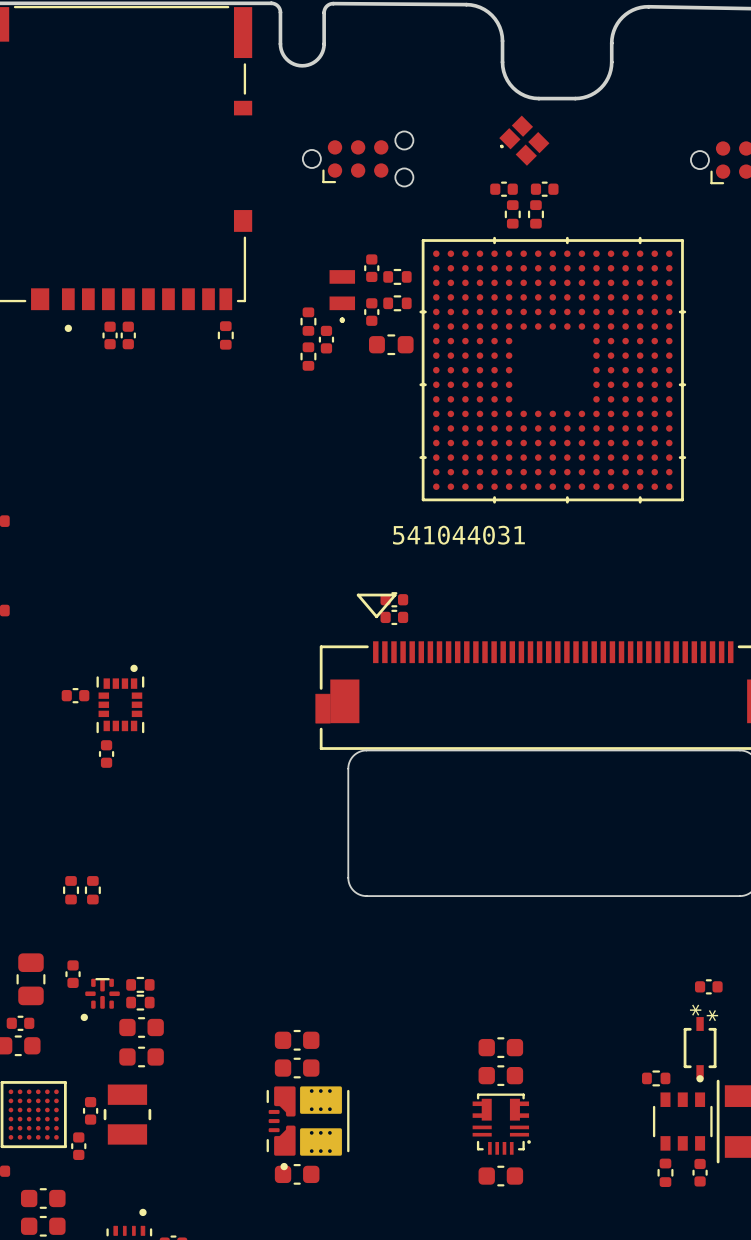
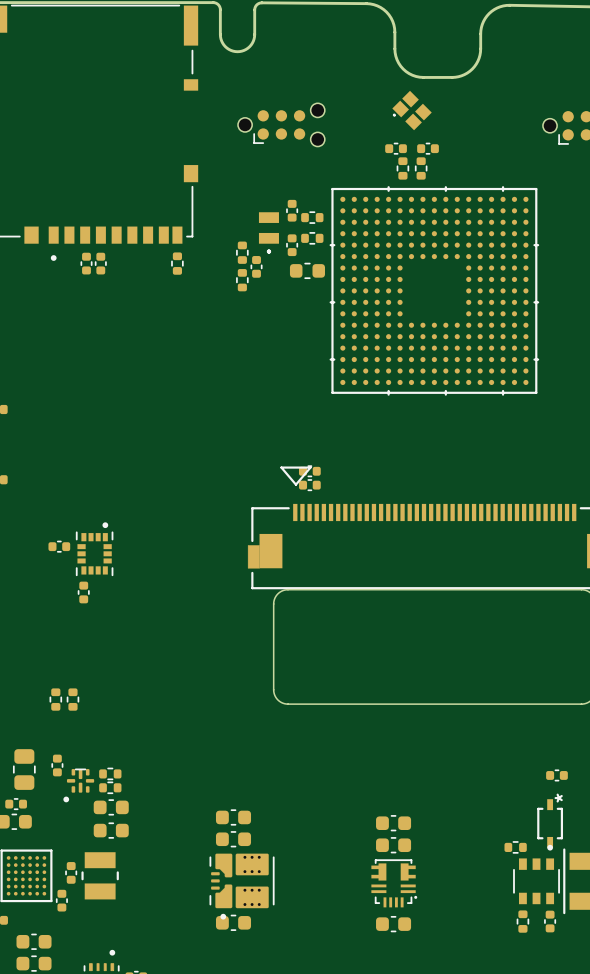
part text: 541044031 (458, 535) -> none
part text: * (695, 1010) -> none

